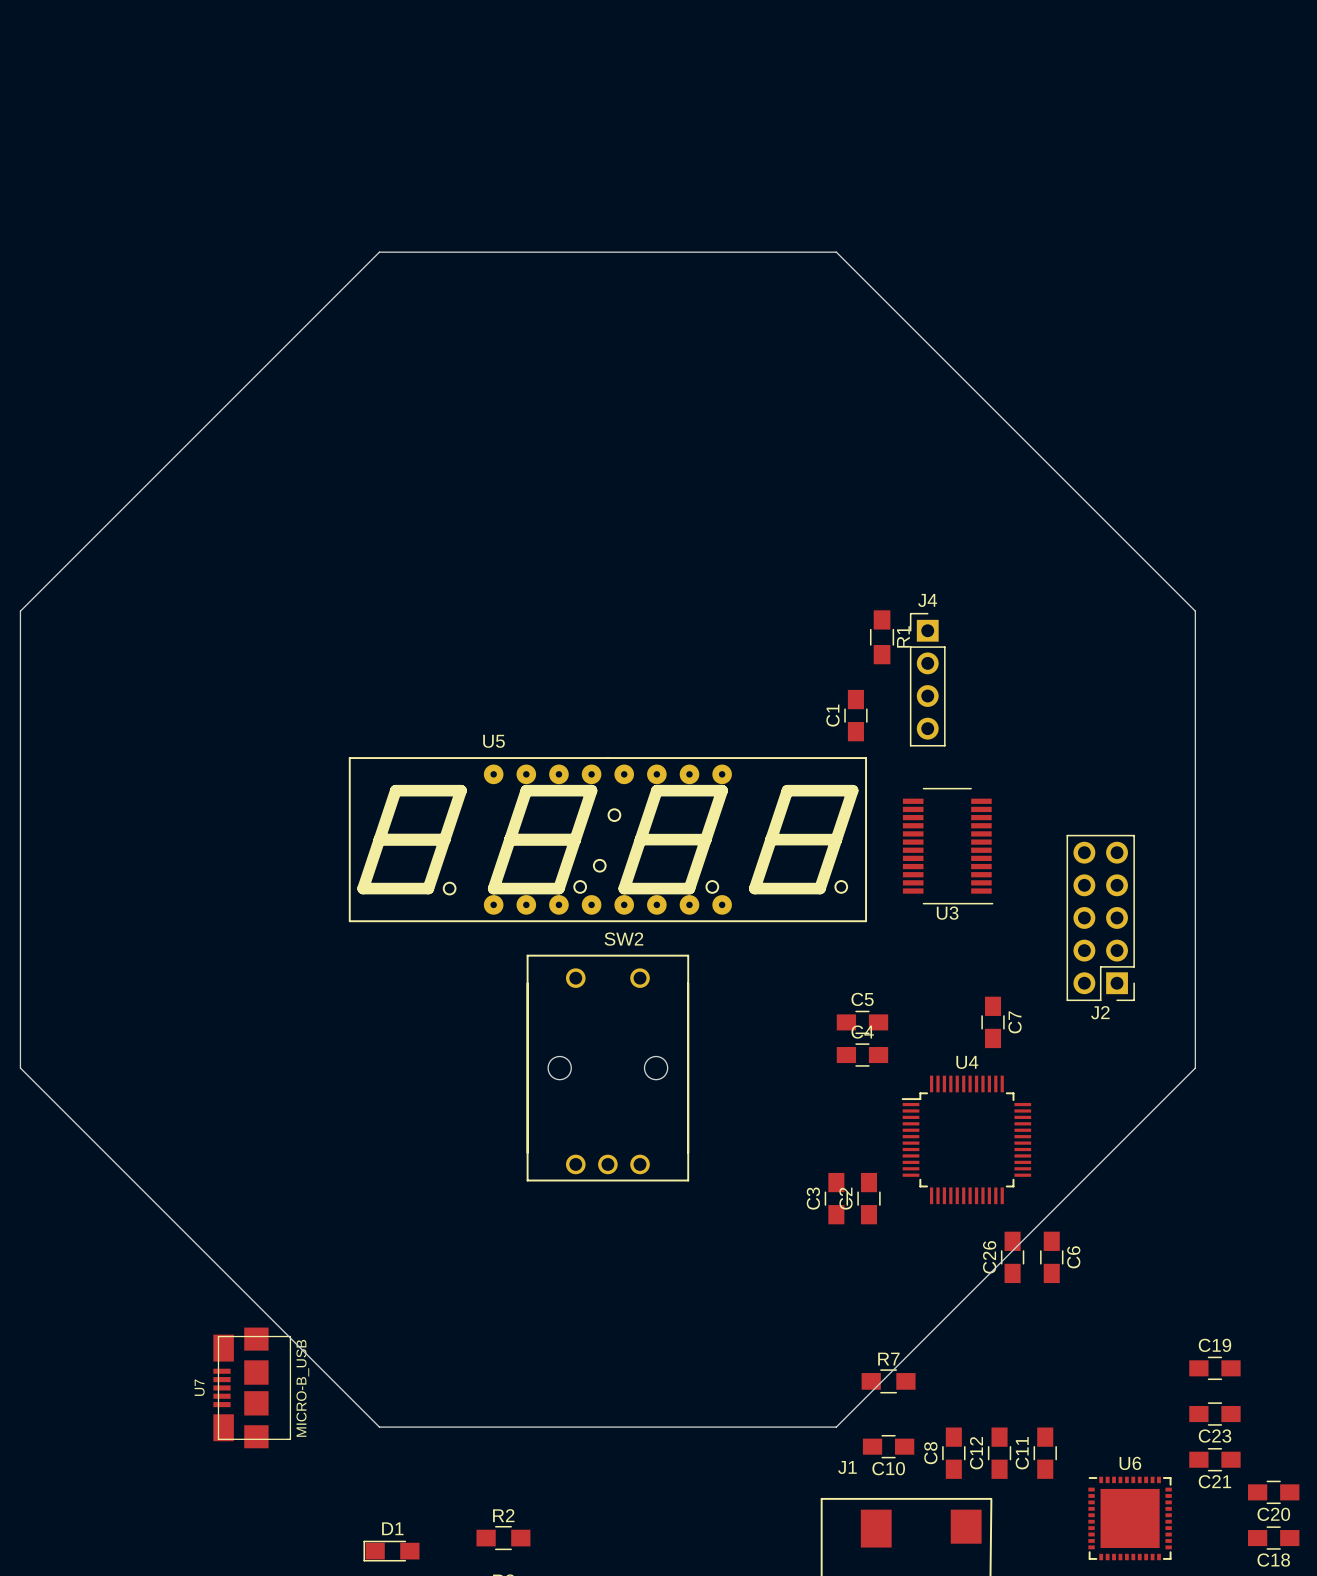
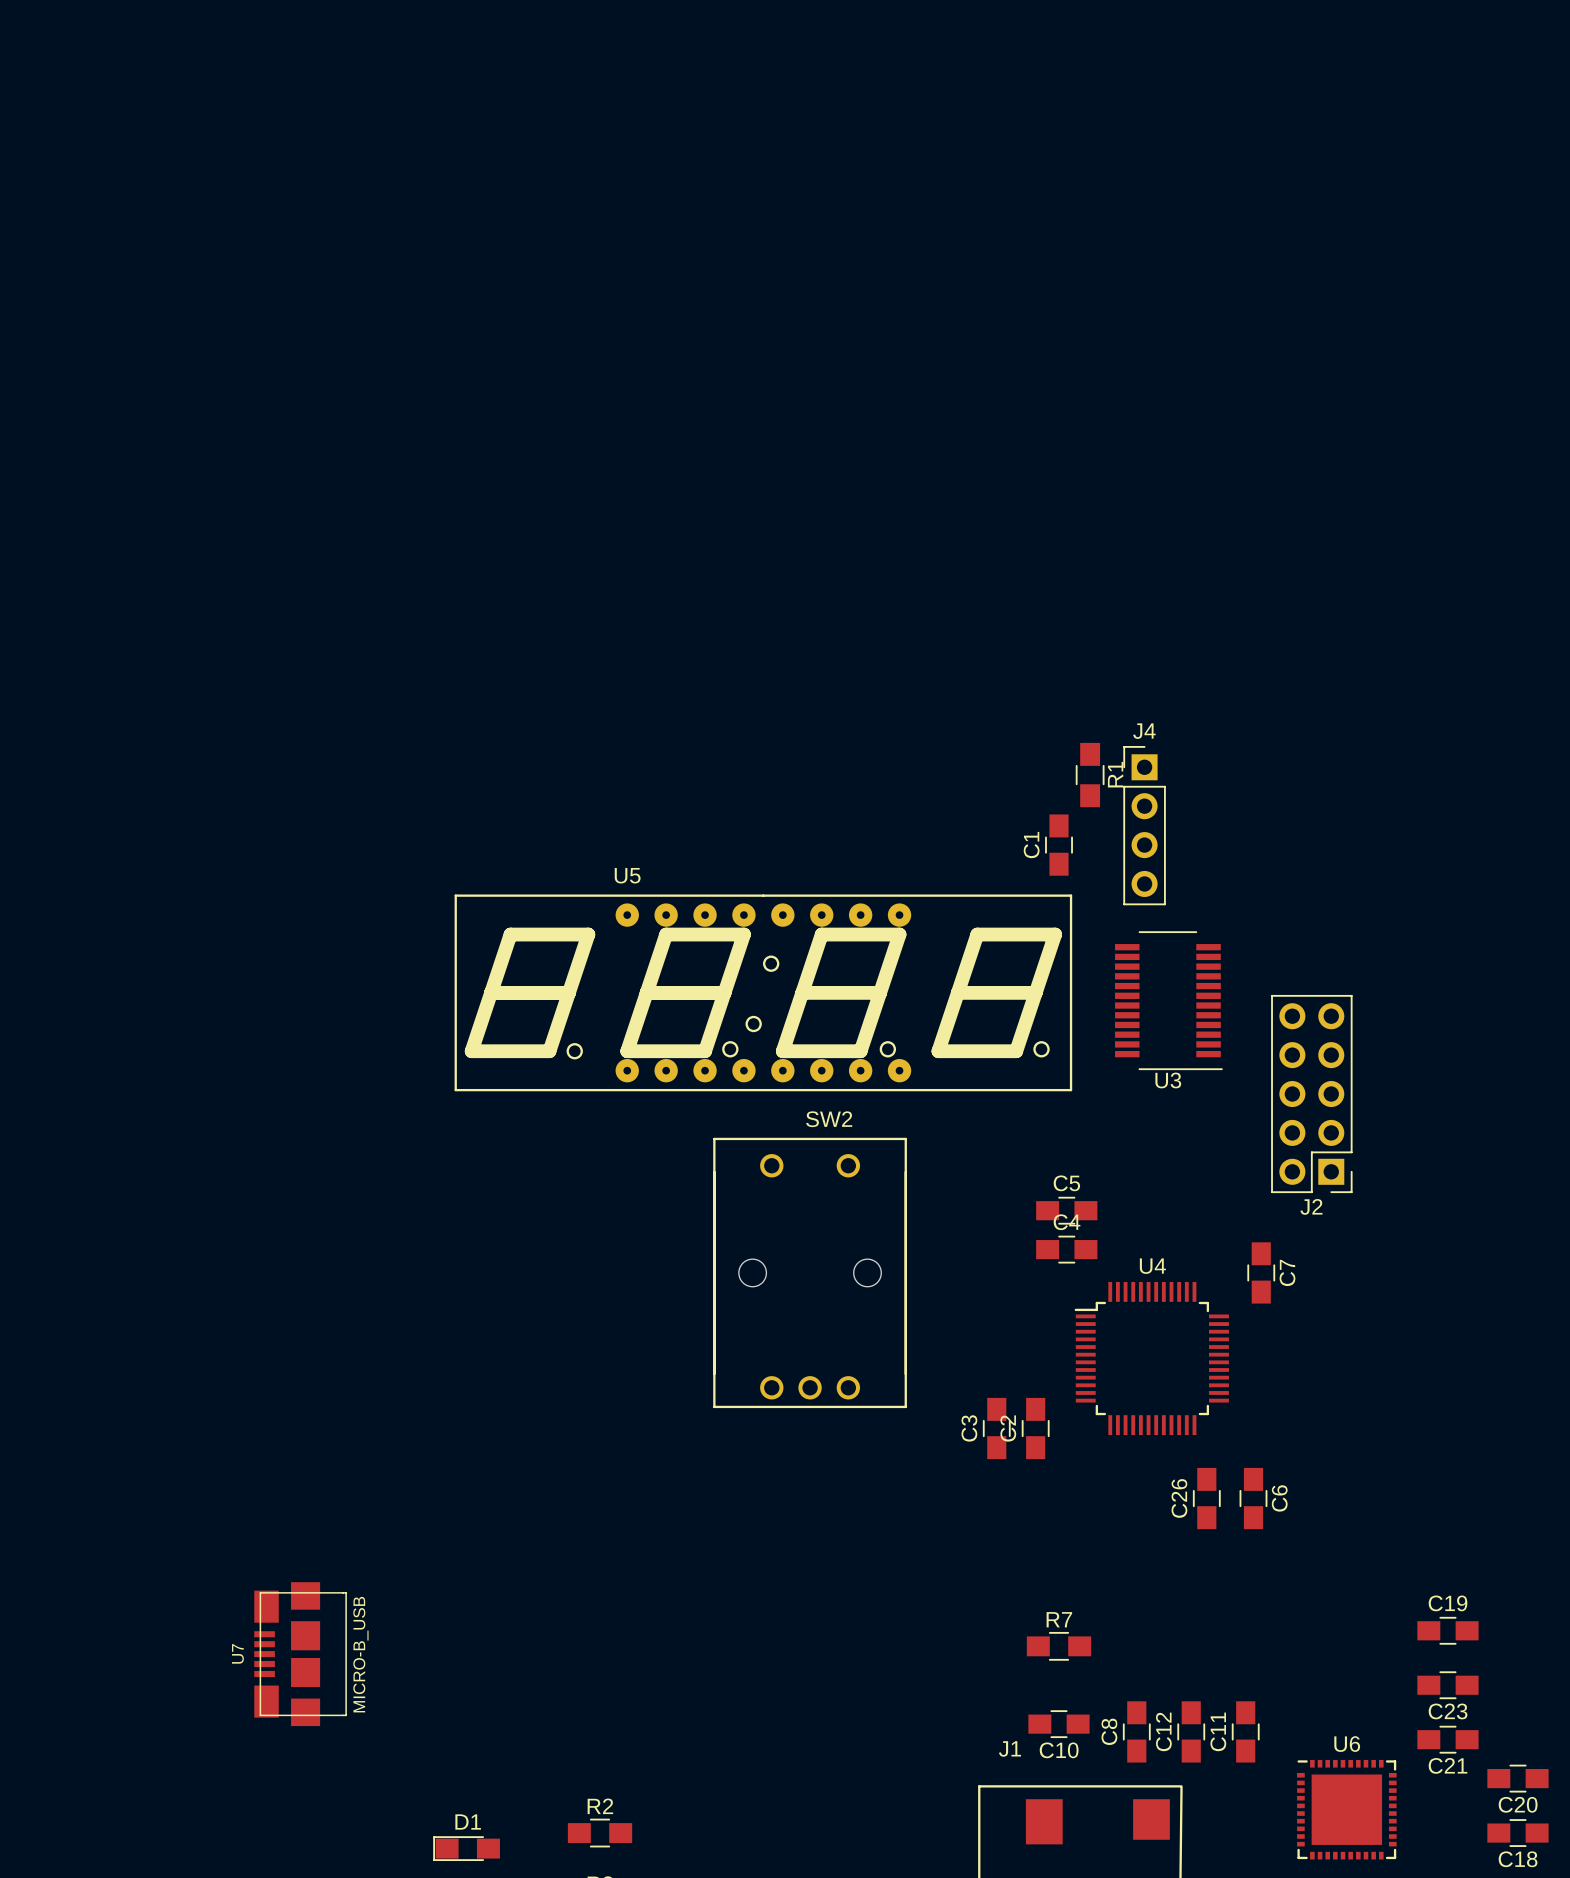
board edge: (379, 252) (20, 611) (20, 1068) (379, 1427) (836, 1427) (1195, 1068) (1195, 611) (836, 252) (379, 252) -> none
R1 position: (882, 637) -> (1090, 775)
J4 position: (927, 679) -> (1144, 825)
C1 position: (855, 715) -> (1059, 845)
U5 position: (607, 839) -> (763, 992)
U3 position: (948, 846) -> (1168, 1000)
C5 position: (862, 1022) -> (1066, 1210)
C7 position: (993, 1022) -> (1261, 1272)
C4 position: (862, 1055) -> (1066, 1249)
SW2 position: (607, 1068) -> (810, 1272)

